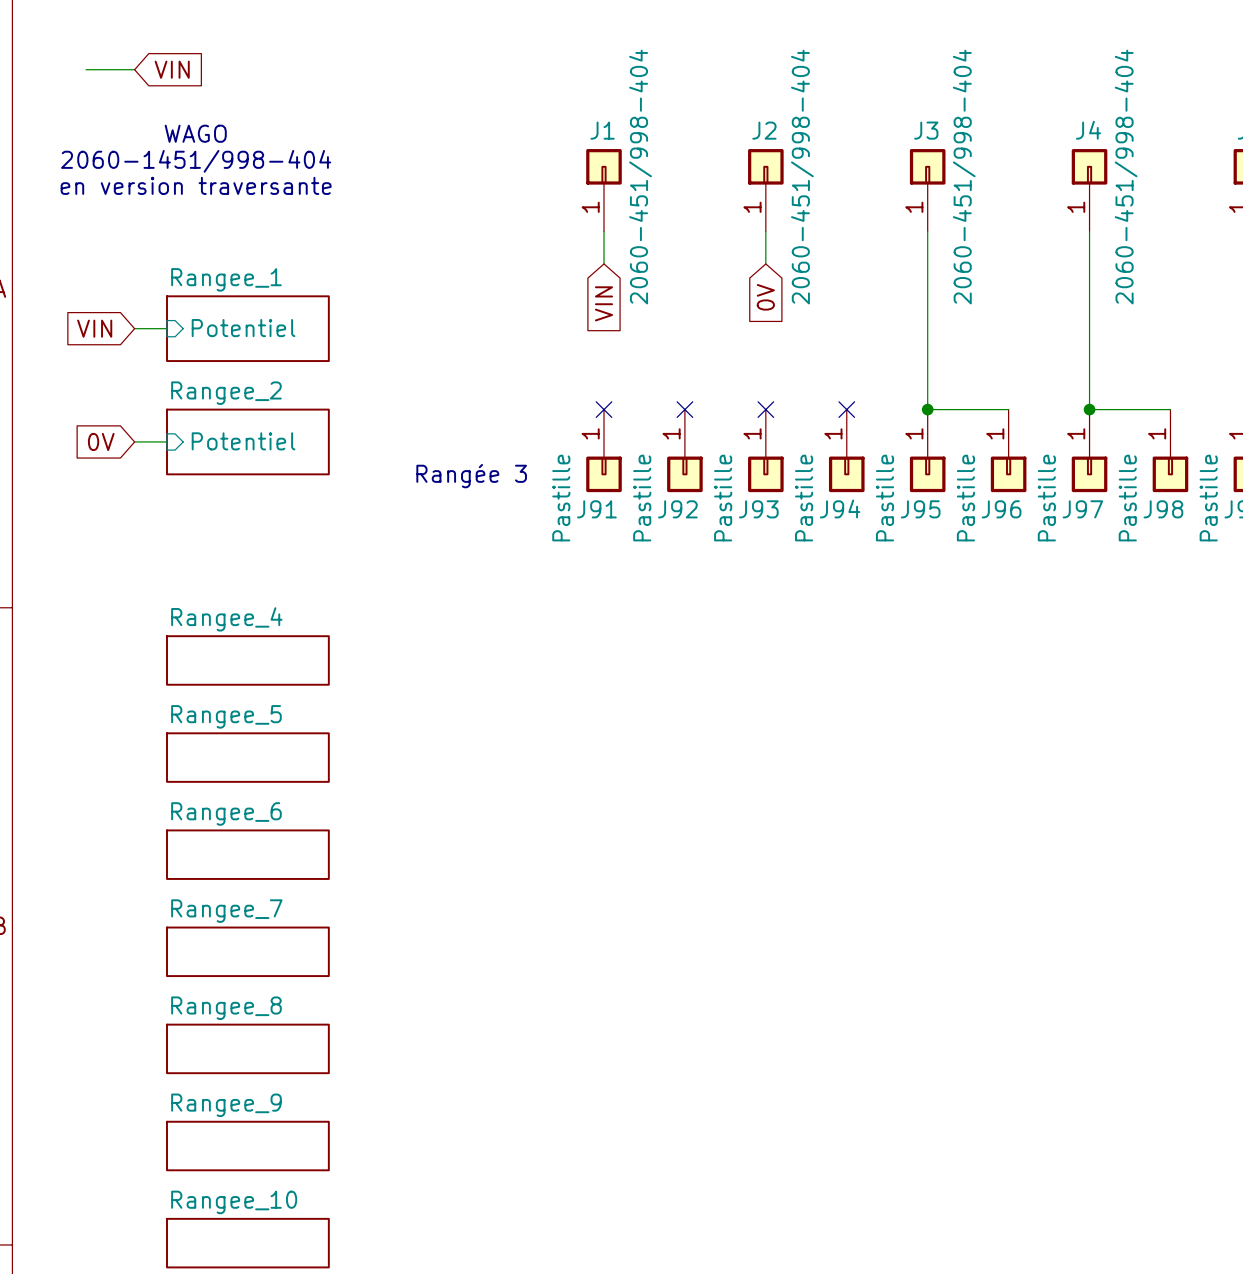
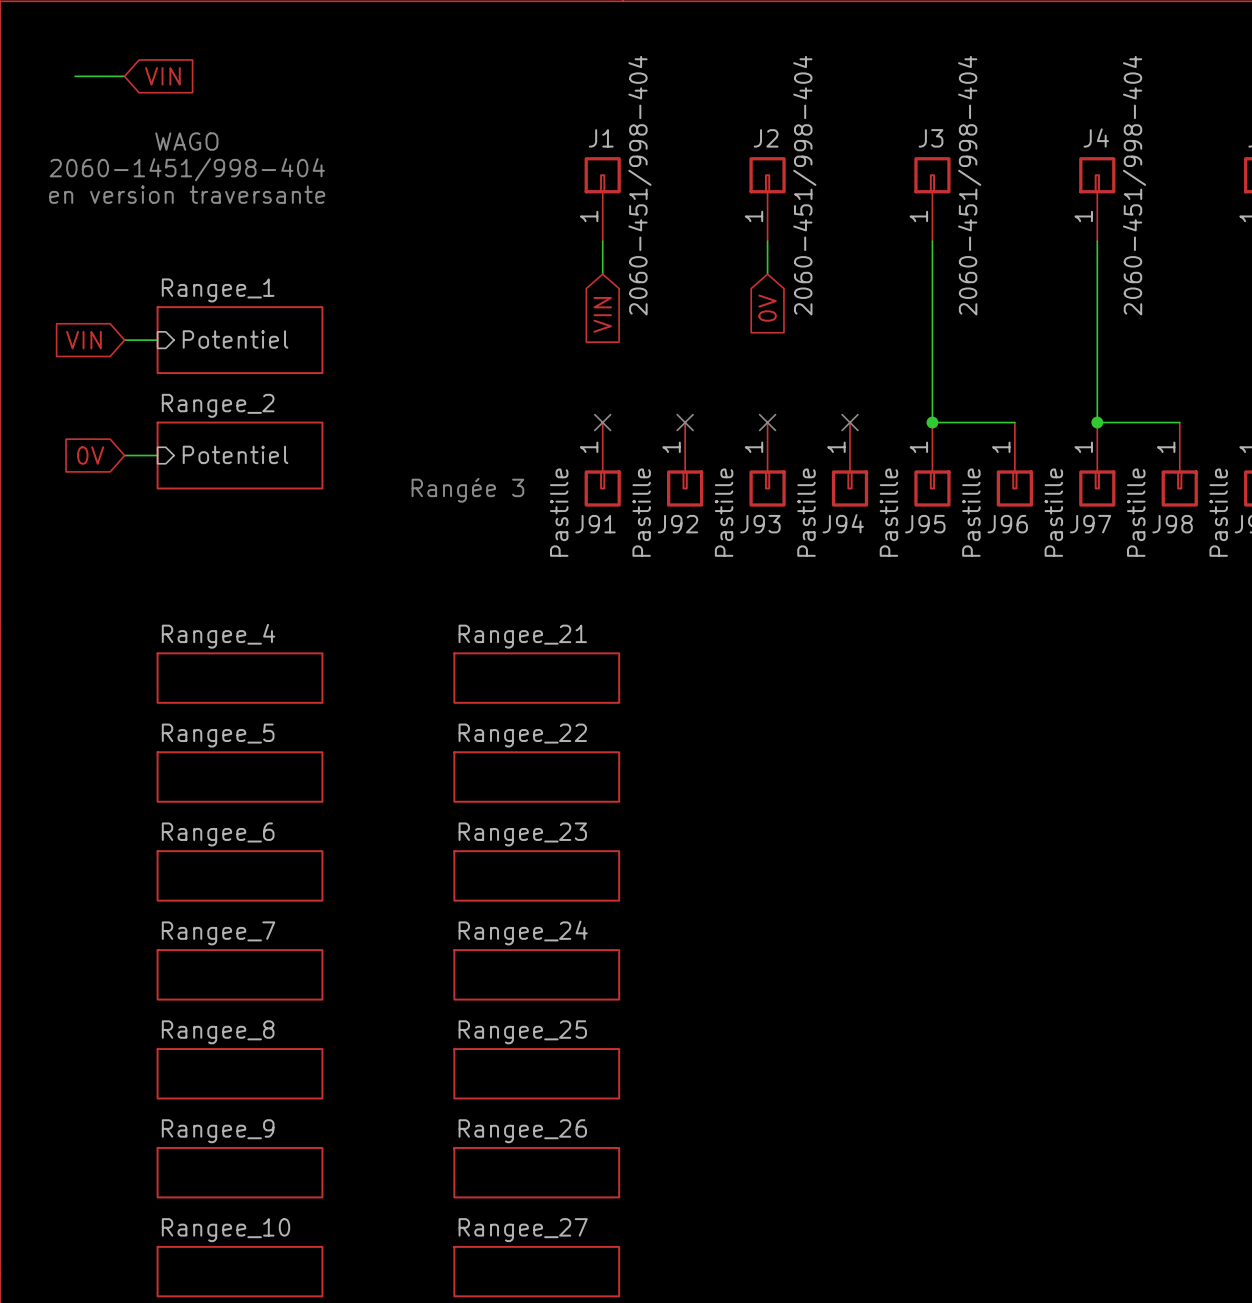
sheet Rangee_21: none -> (536, 678)
sheet Rangee_22: none -> (536, 777)
sheet Rangee_23: none -> (536, 875)
sheet Rangee_24: none -> (536, 974)
sheet Rangee_25: none -> (536, 1073)
sheet Rangee_26: none -> (536, 1172)
sheet Rangee_27: none -> (536, 1271)

